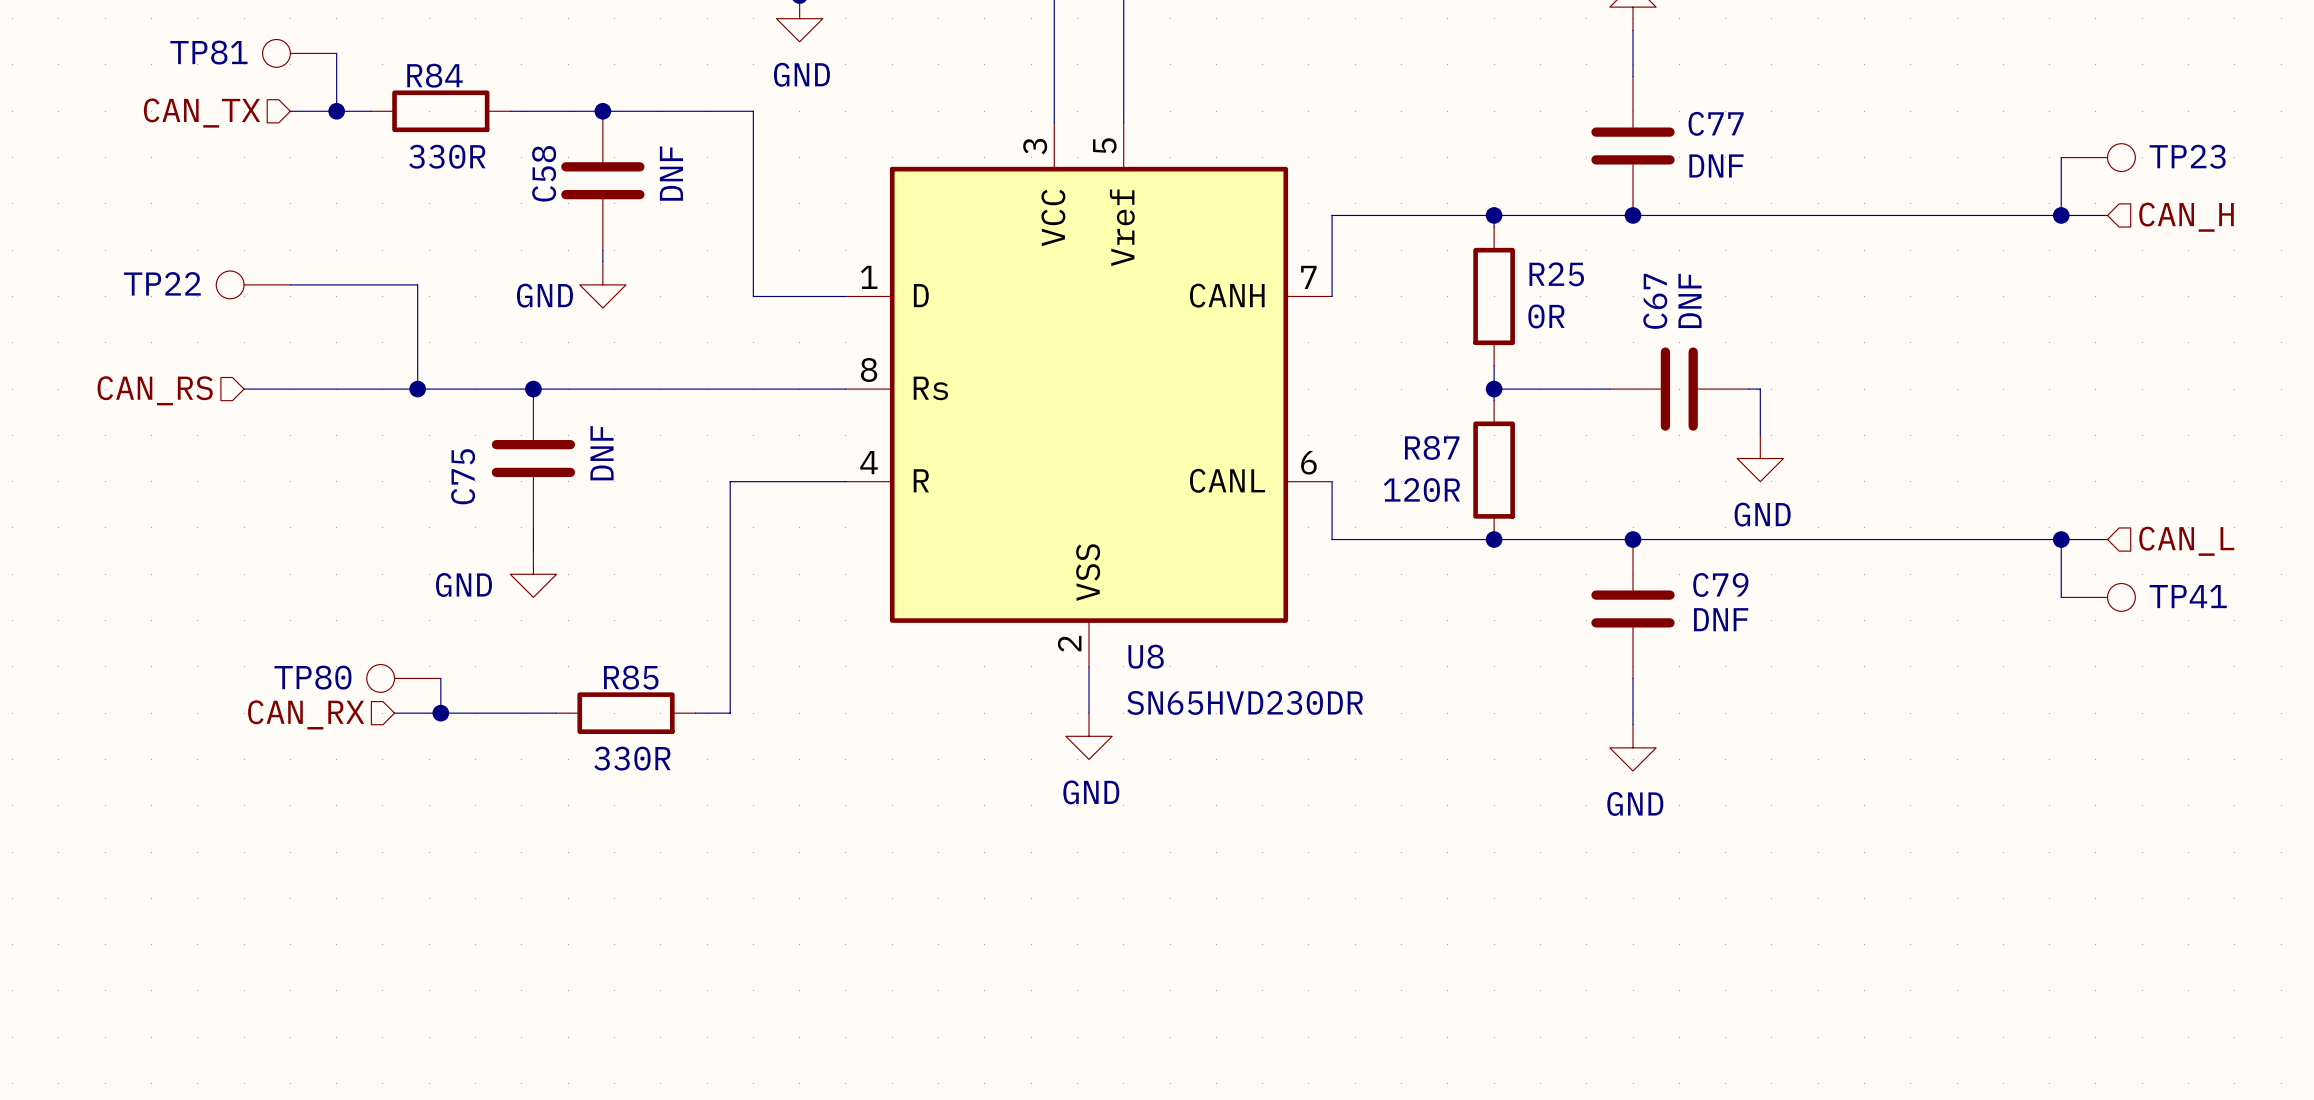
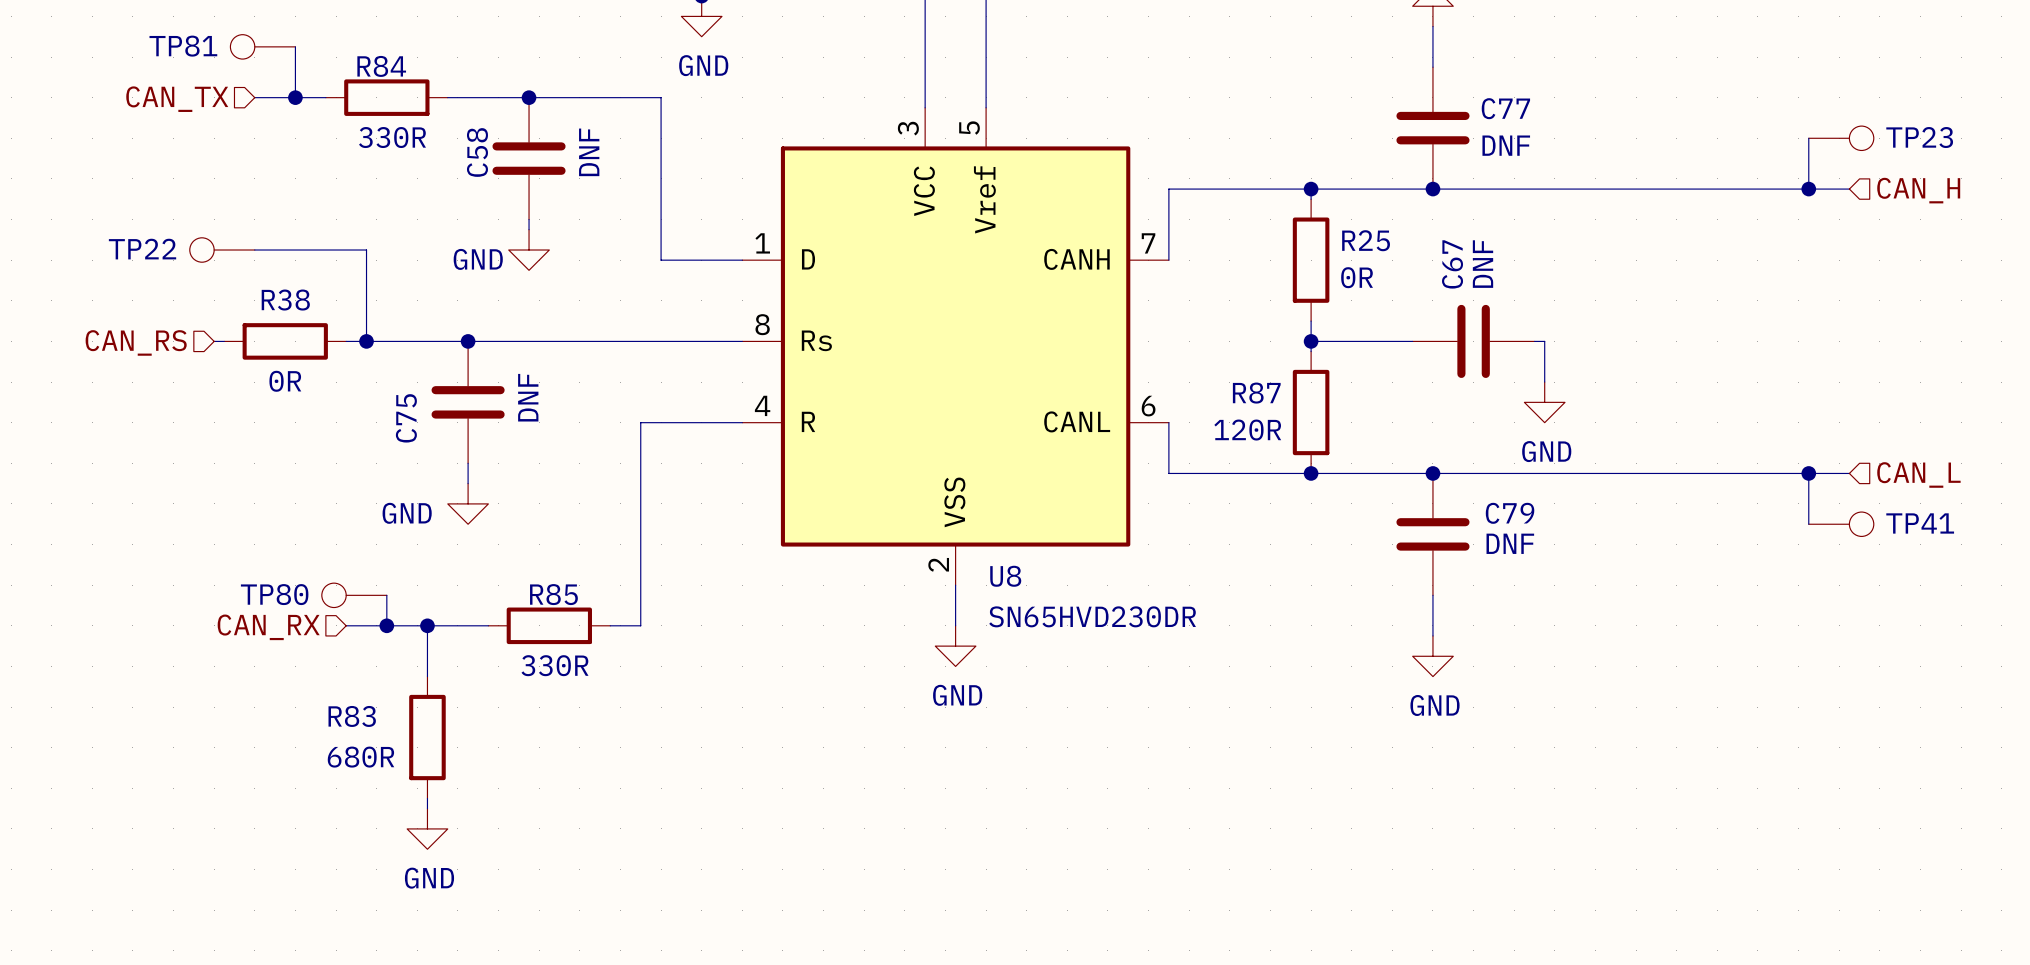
wire: (255, 389) (394, 389) -> none
R38: none -> 0R (285, 341)
wire: none -> (427, 625) (427, 676)
junction: none -> (427, 625)
R83: none -> 680R (427, 737)
wire: none -> (427, 798) (427, 808)
power symbol: none -> GND (427, 828)

